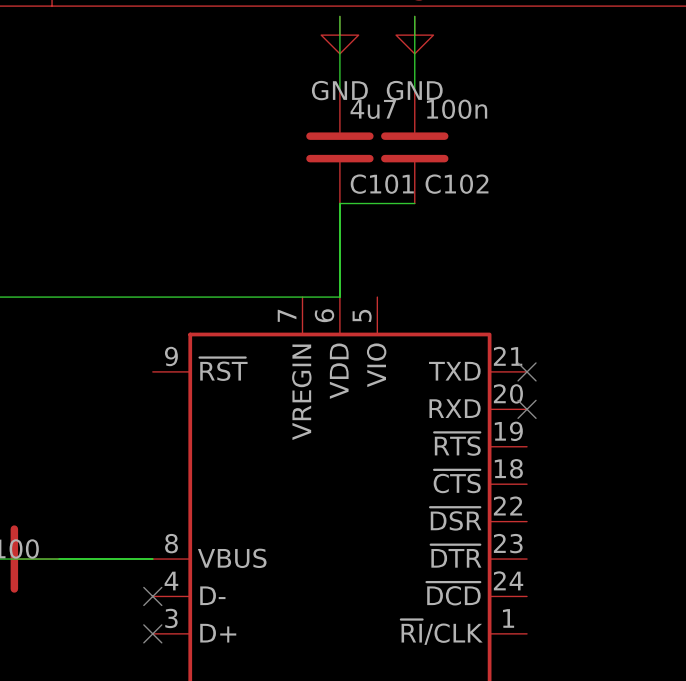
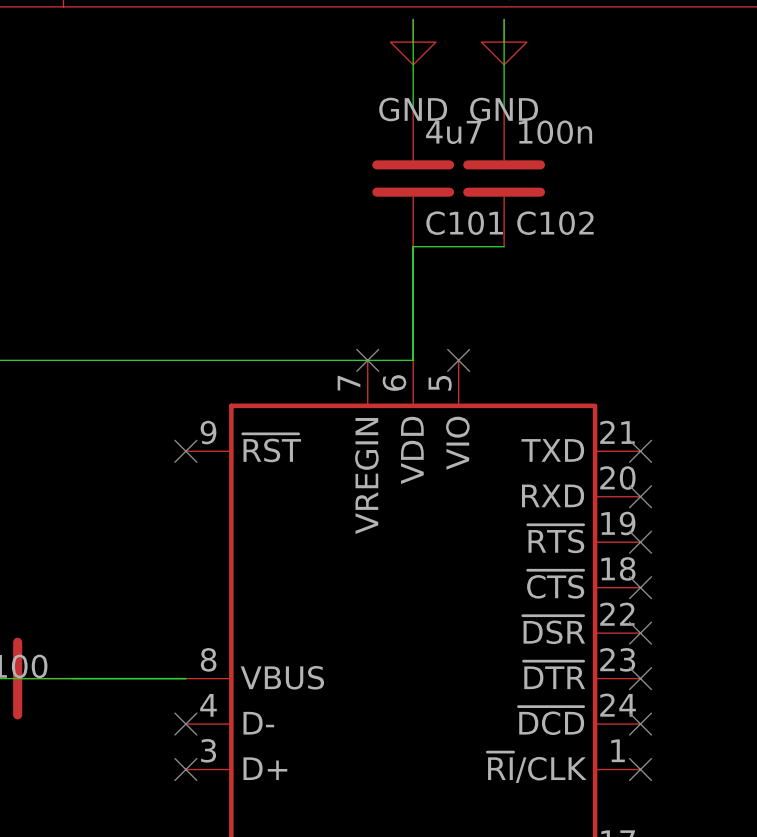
no-connect mark: none -> (367, 360)
no-connect mark: none -> (458, 360)
no-connect mark: none -> (185, 451)
no-connect mark: none -> (640, 542)
no-connect mark: none -> (640, 587)
no-connect mark: none -> (640, 633)
no-connect mark: none -> (640, 678)
no-connect mark: none -> (640, 724)
no-connect mark: none -> (640, 769)

